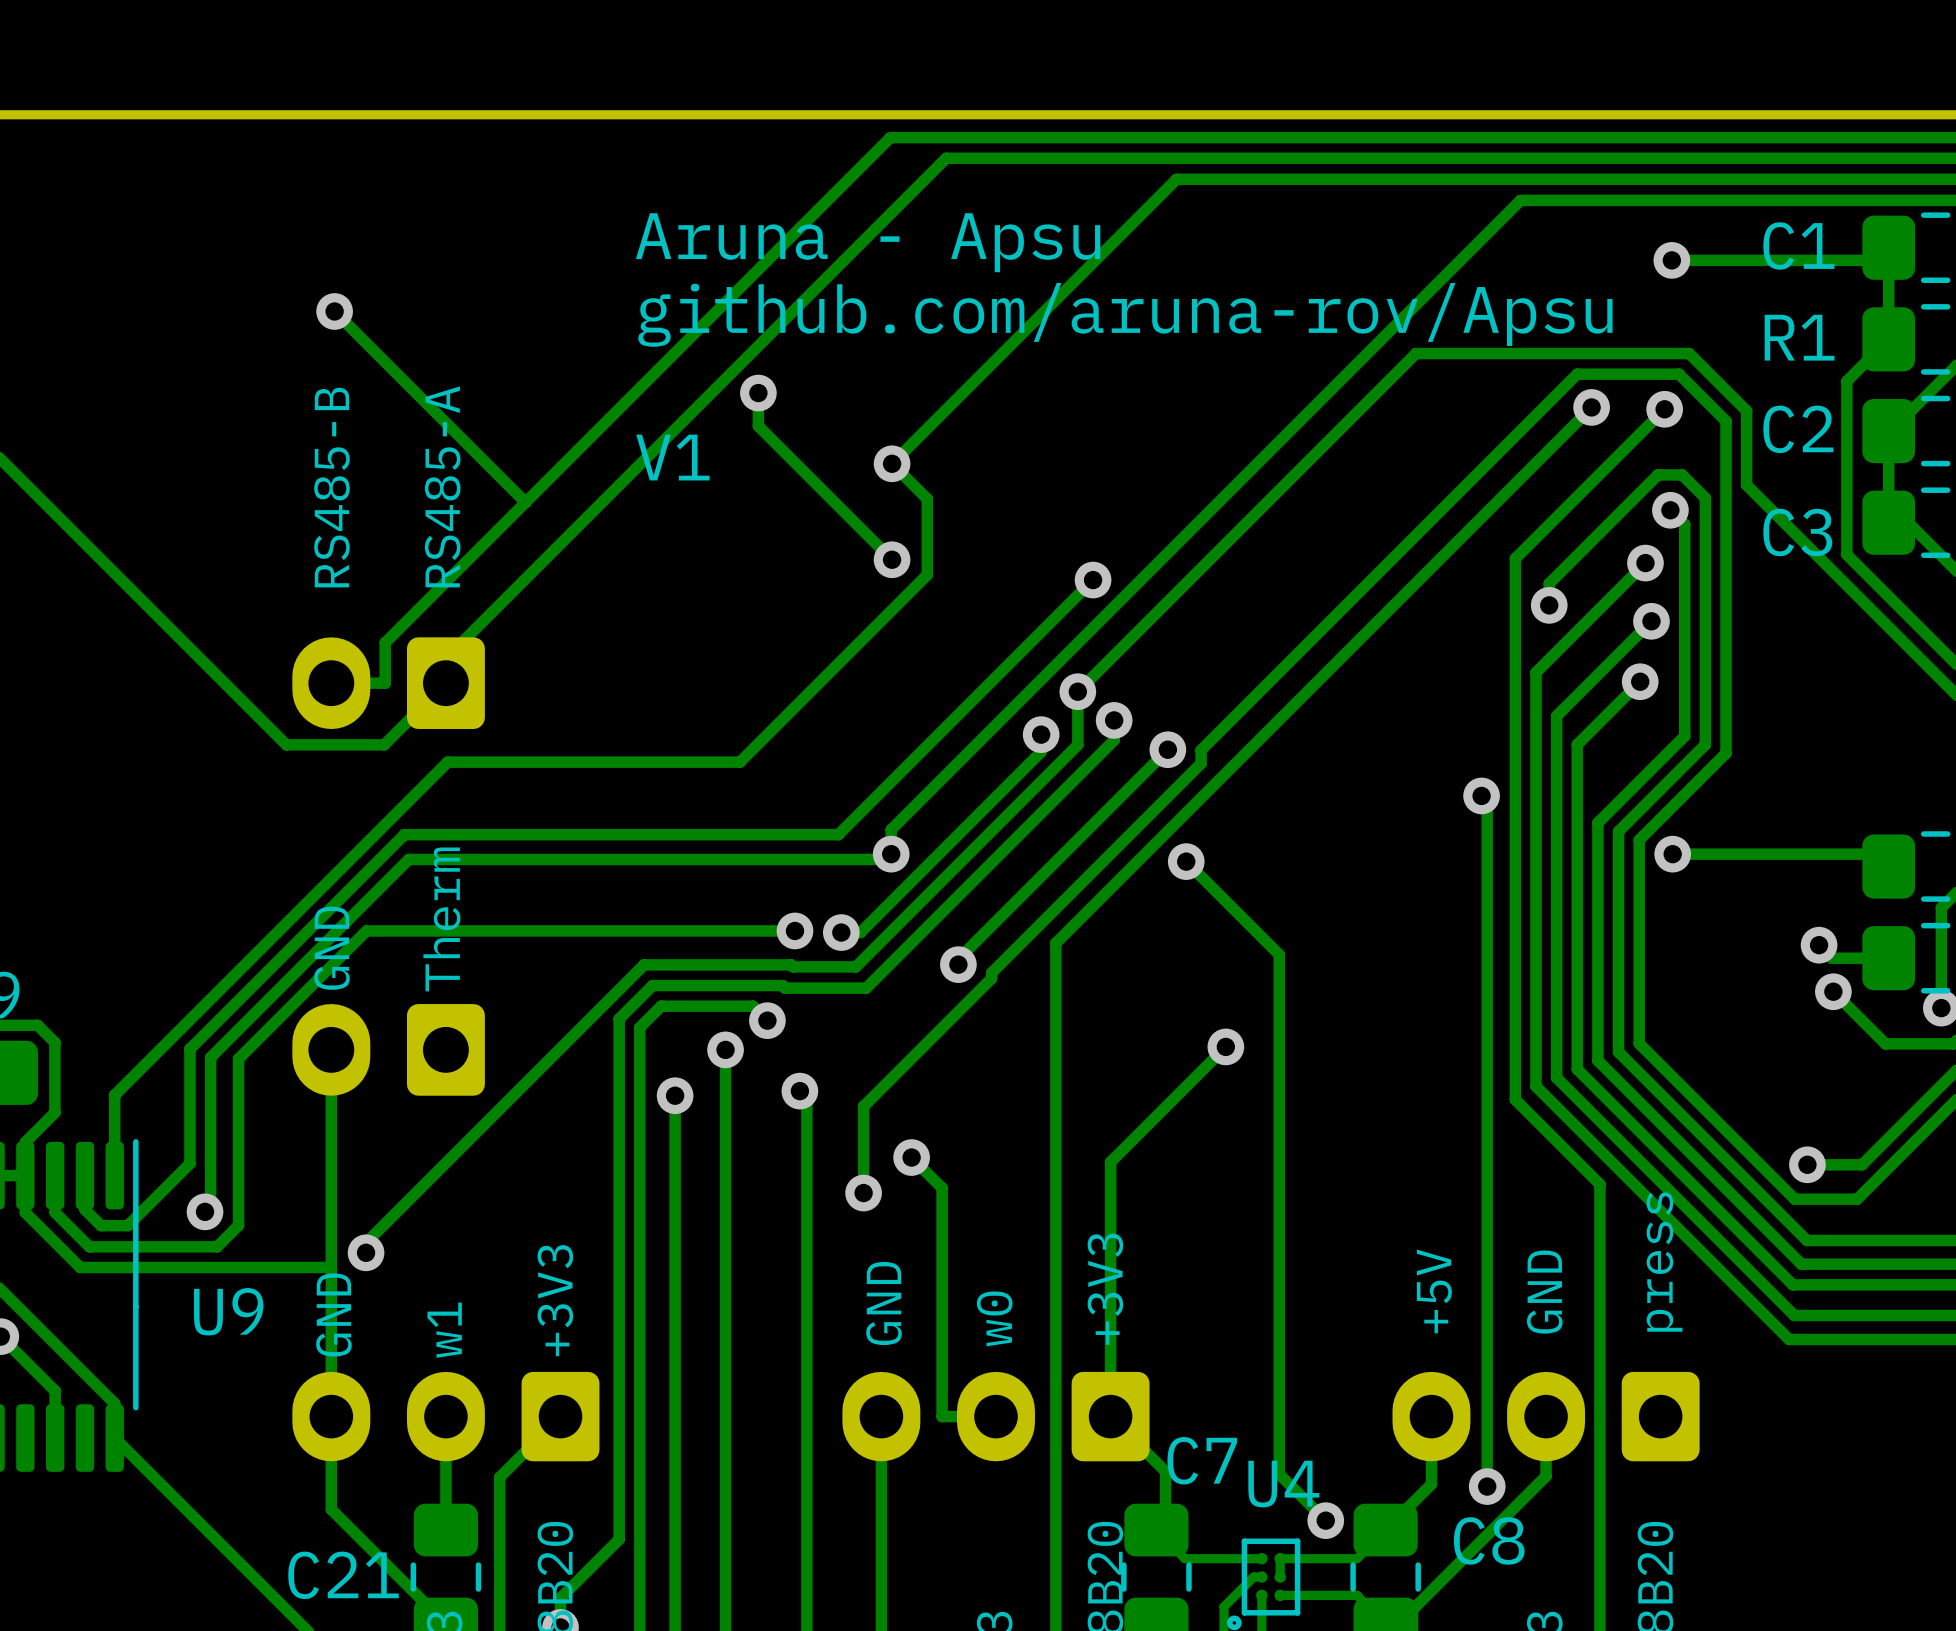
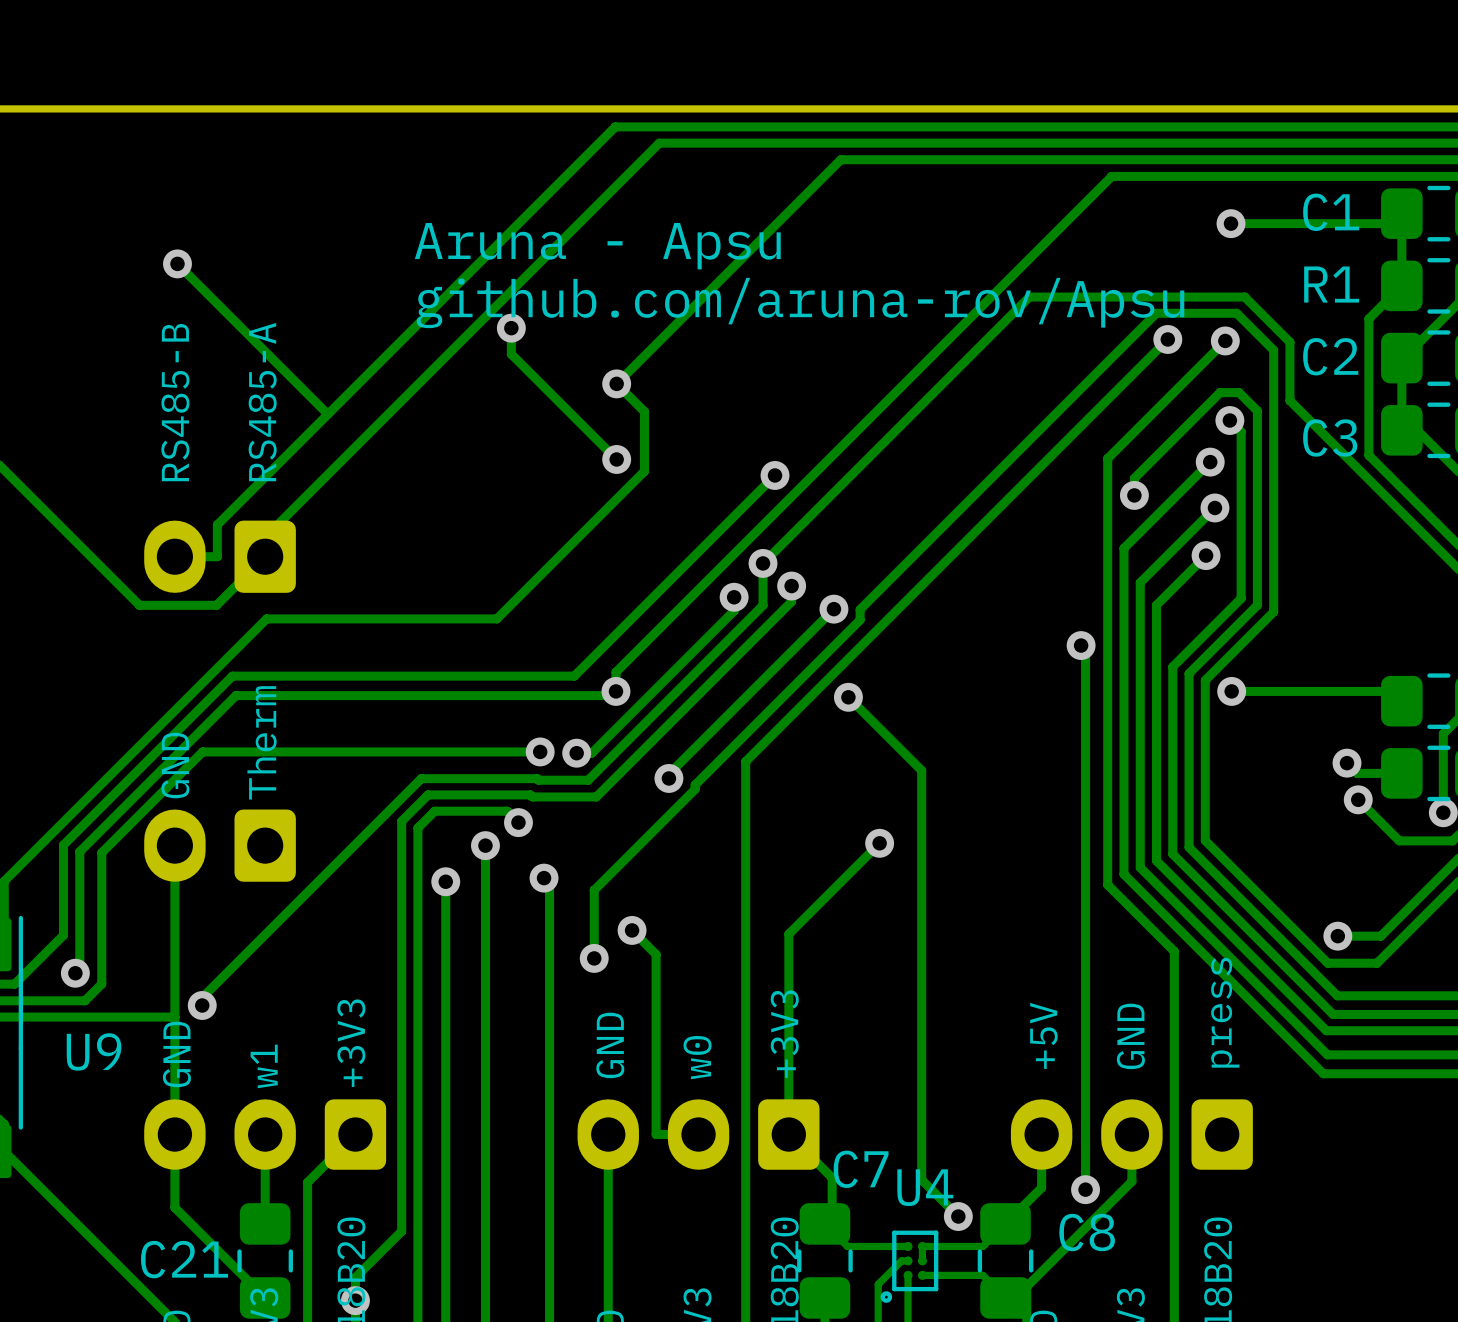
text position: Aruna - Apsu (868, 242) -> Aruna - Apsu (597, 246)
text position: github.com/aruna-rov/Apsu (1125, 314) -> github.com/aruna-rov/Apsu (800, 303)
text: V1 (672, 457) -> none

